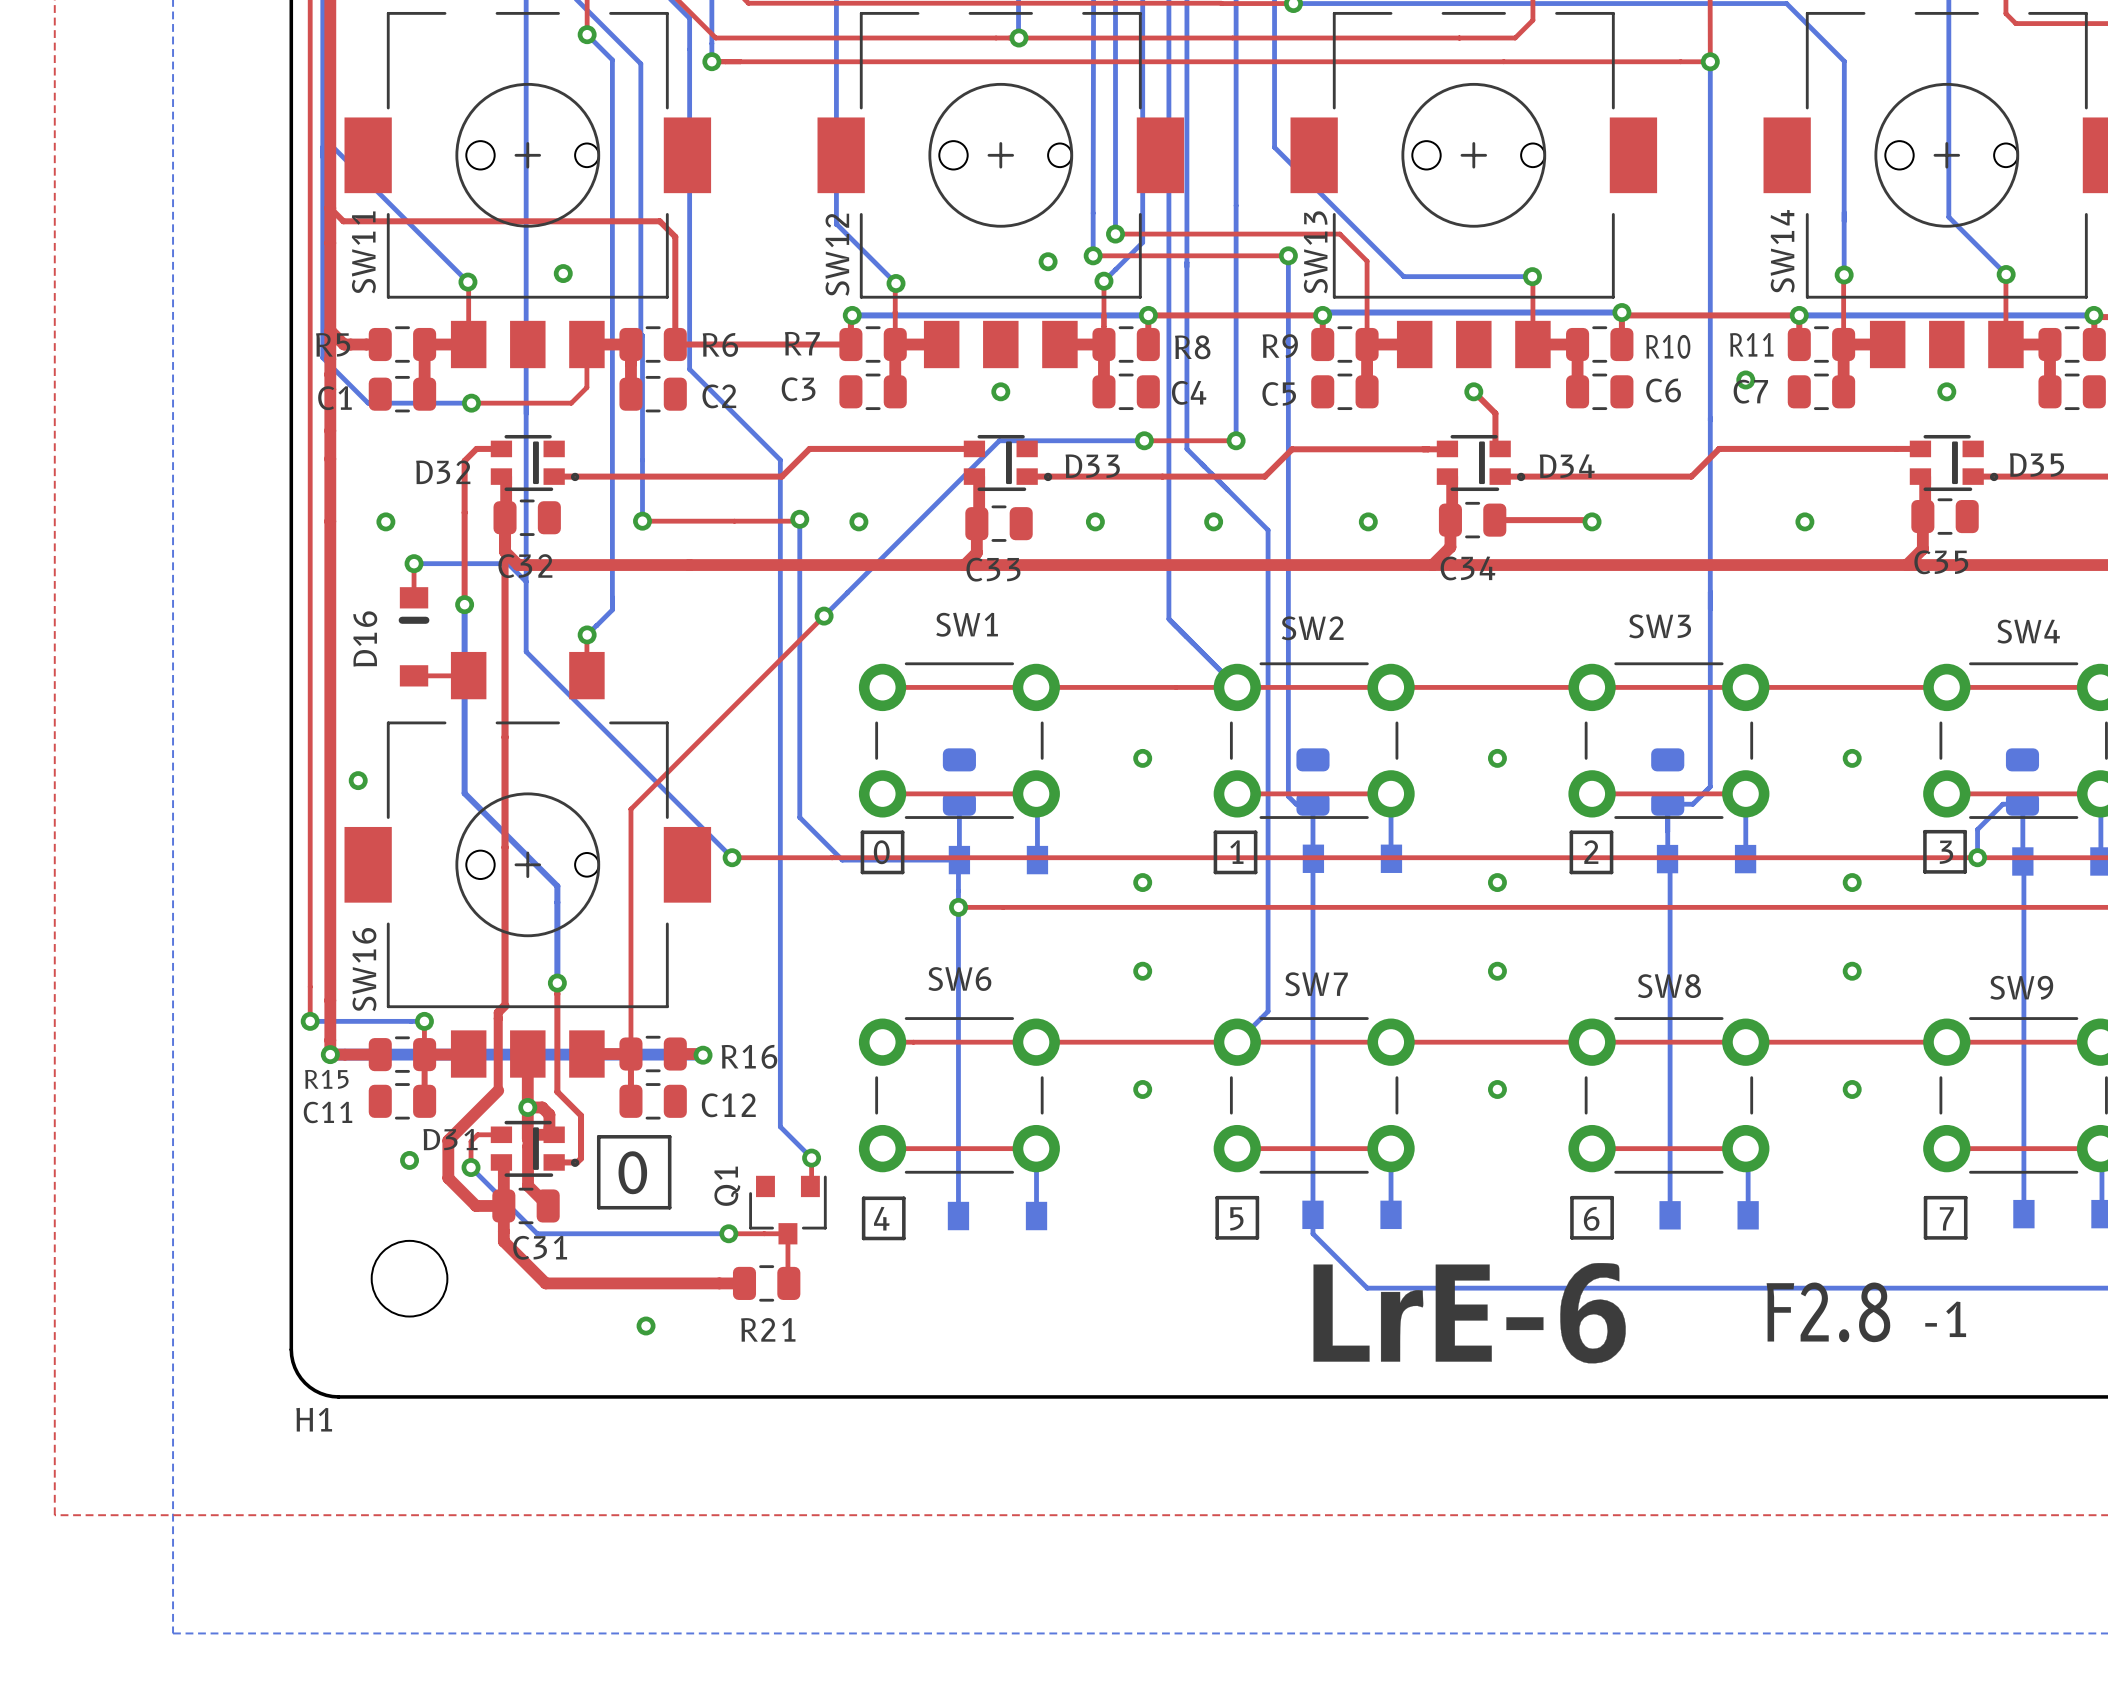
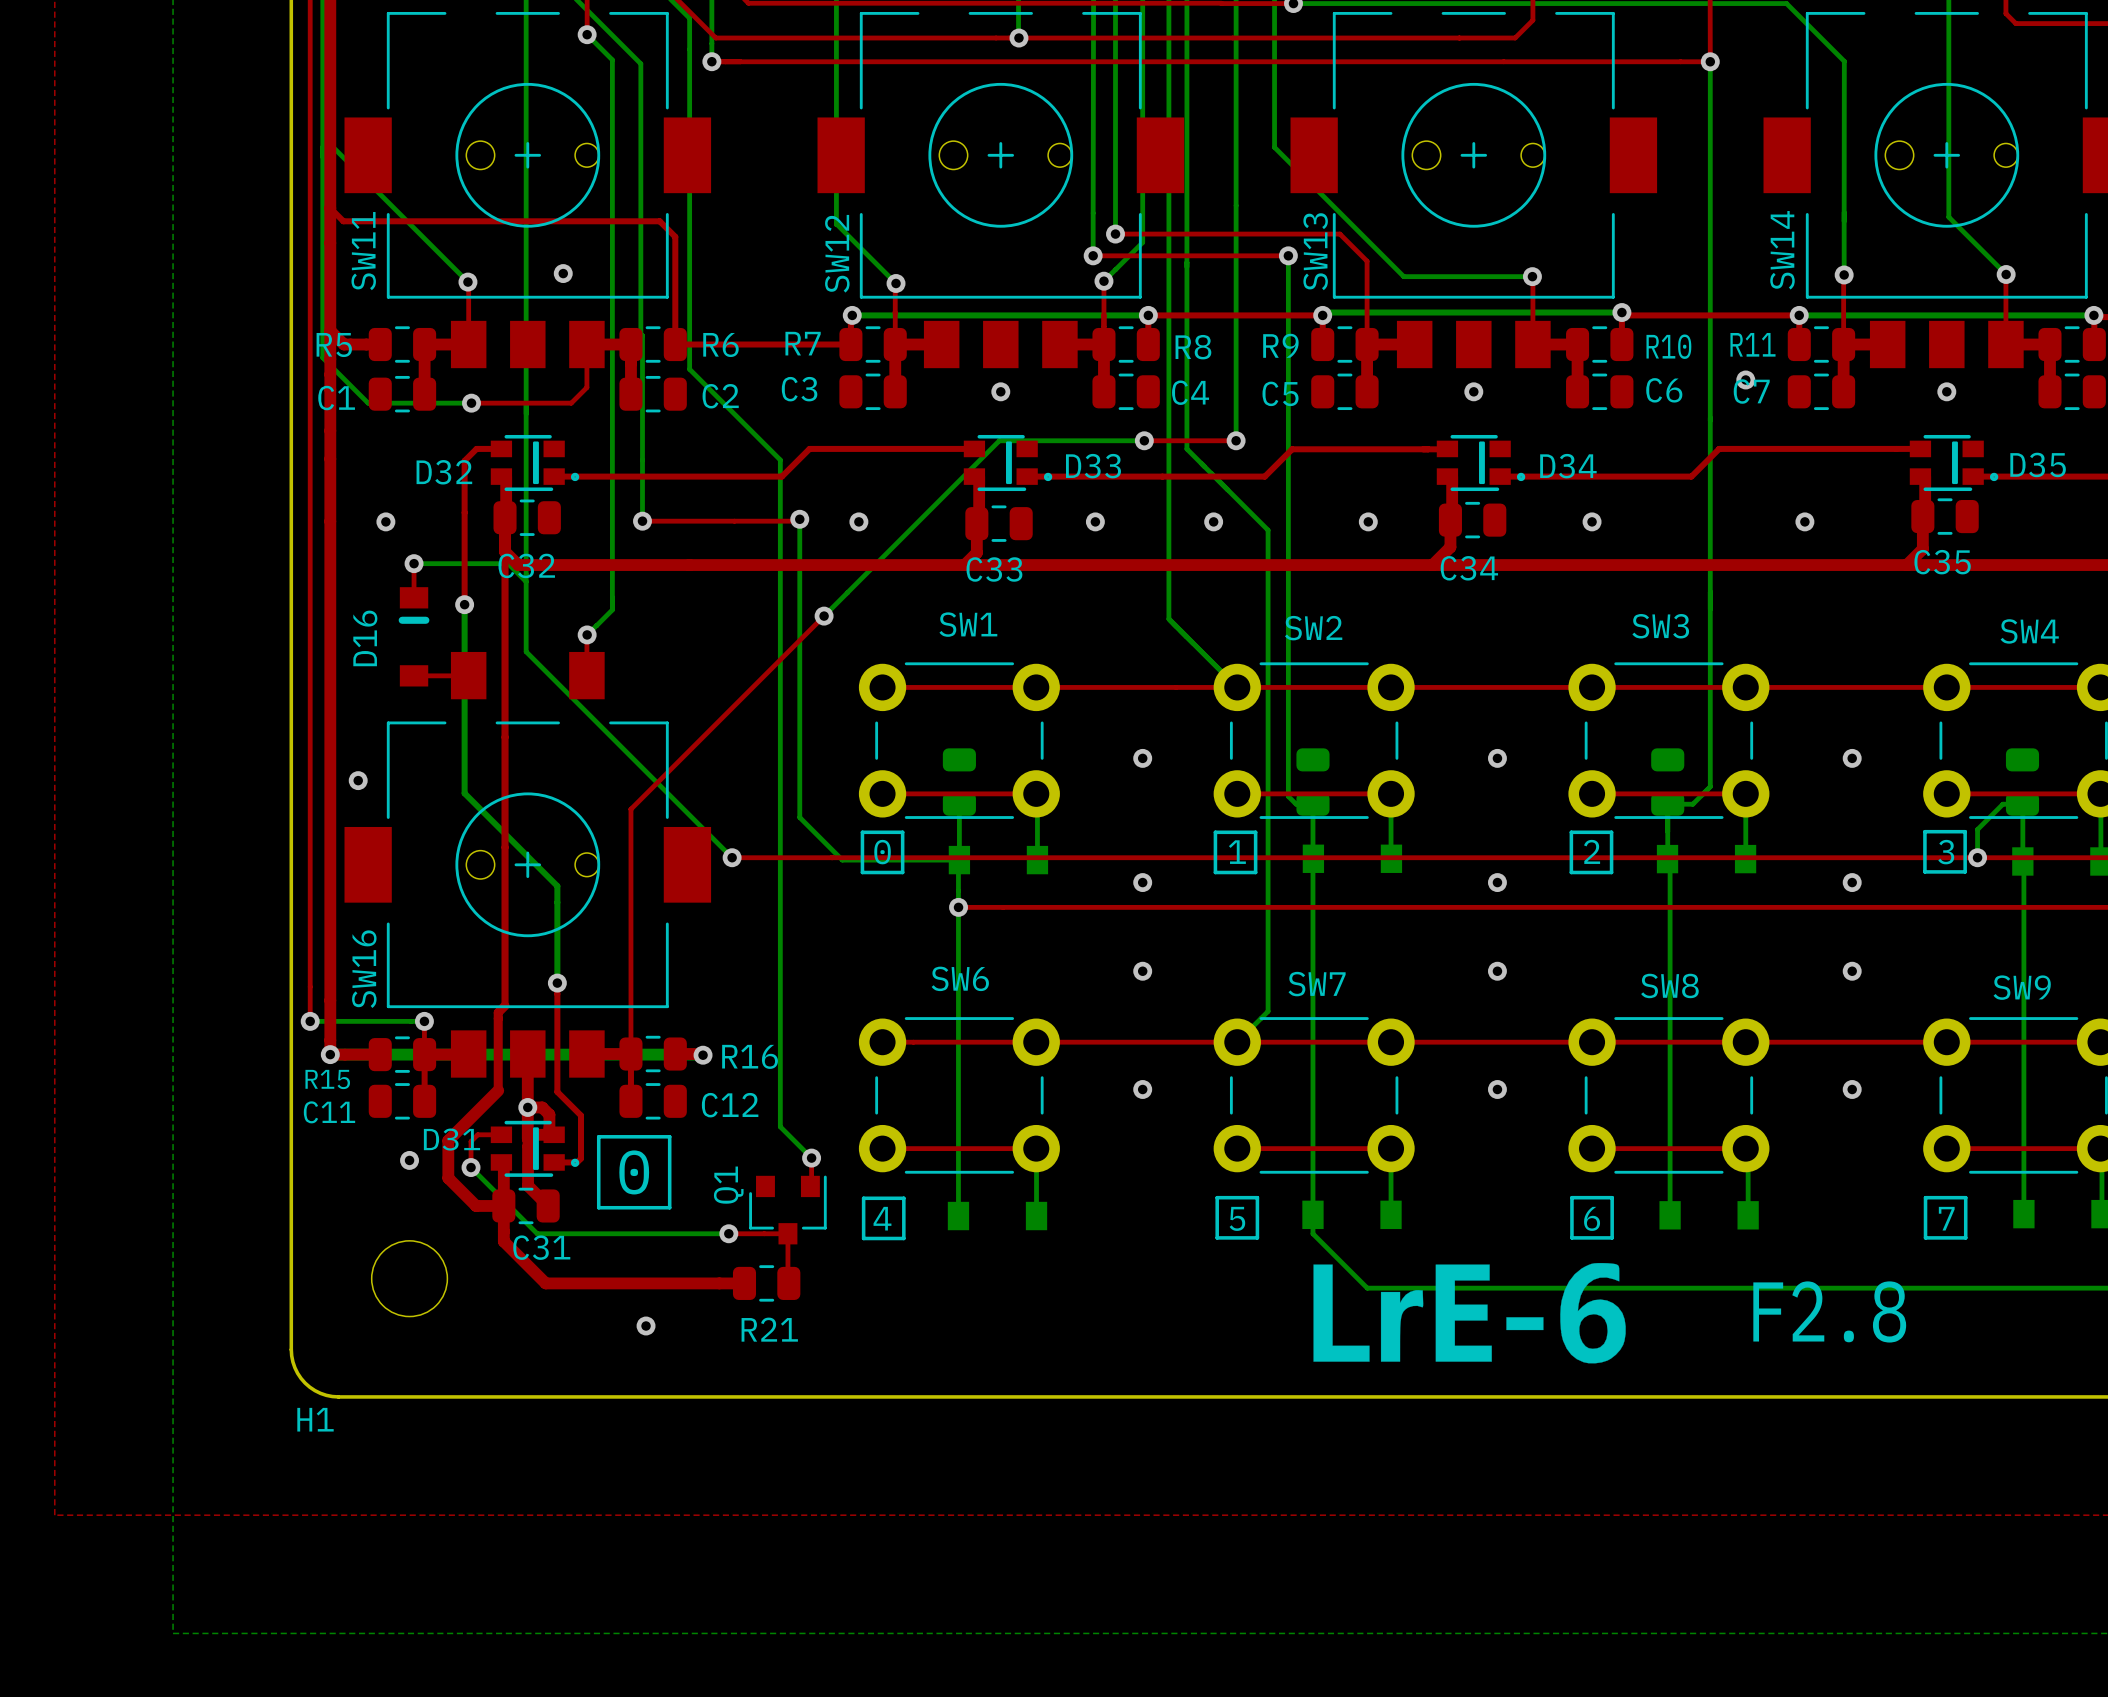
via: (1048, 261) -> none
top track: (1473, 391) (1495, 413) (1495, 448) -> none
top track: (1494, 520) (1590, 520) (1592, 521) -> none
text: -1 (1945, 1319) -> none

